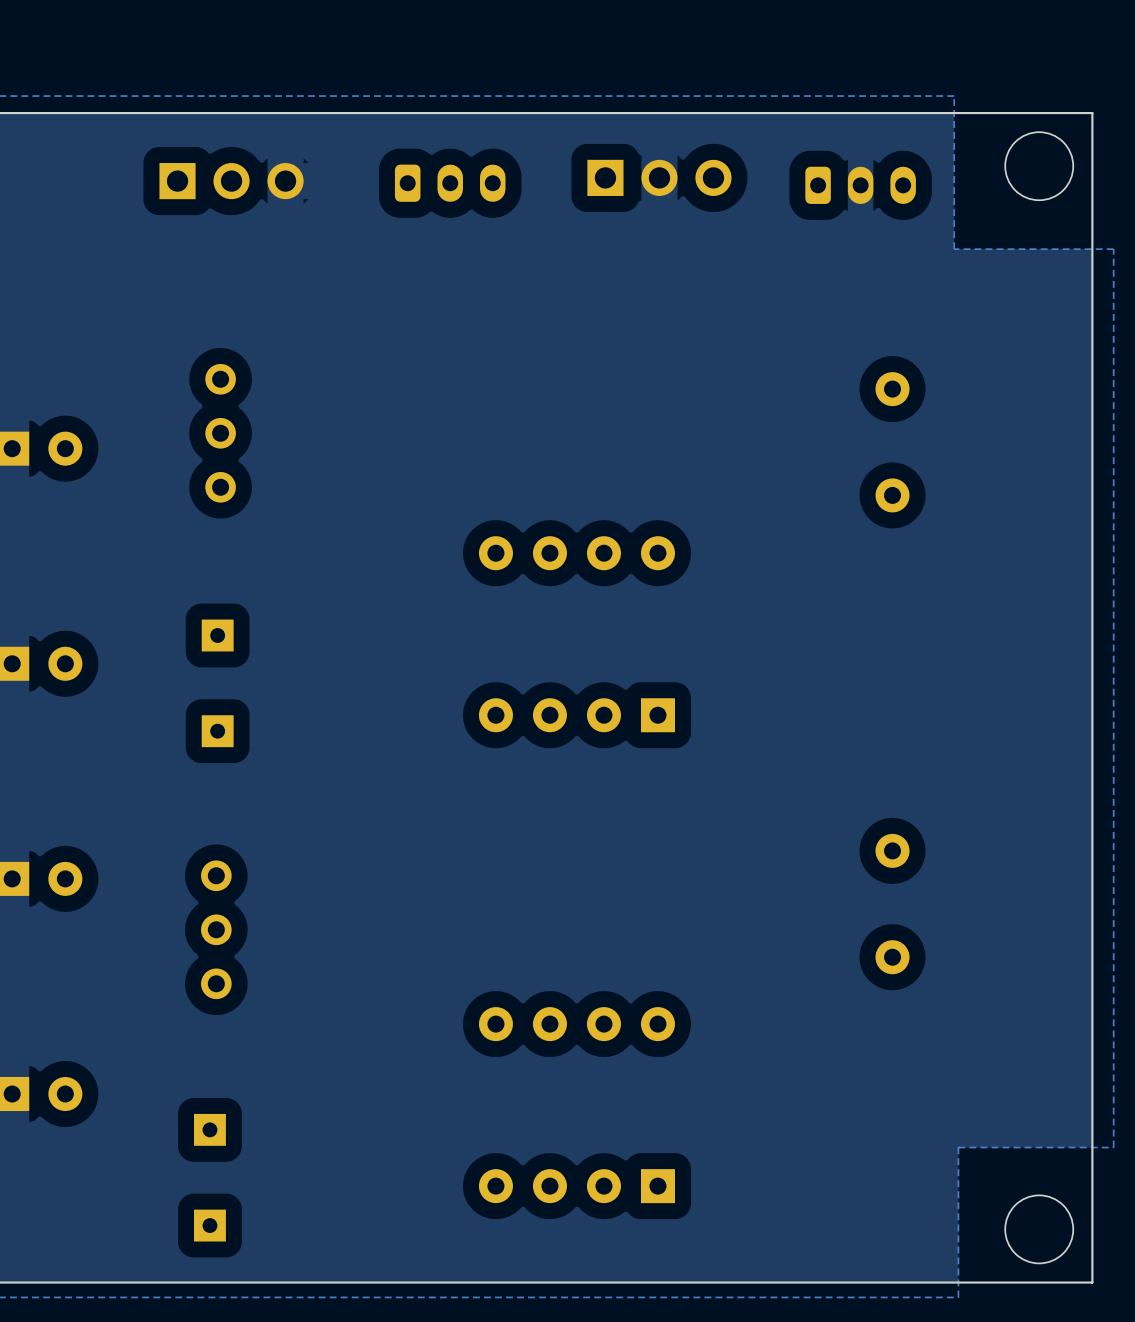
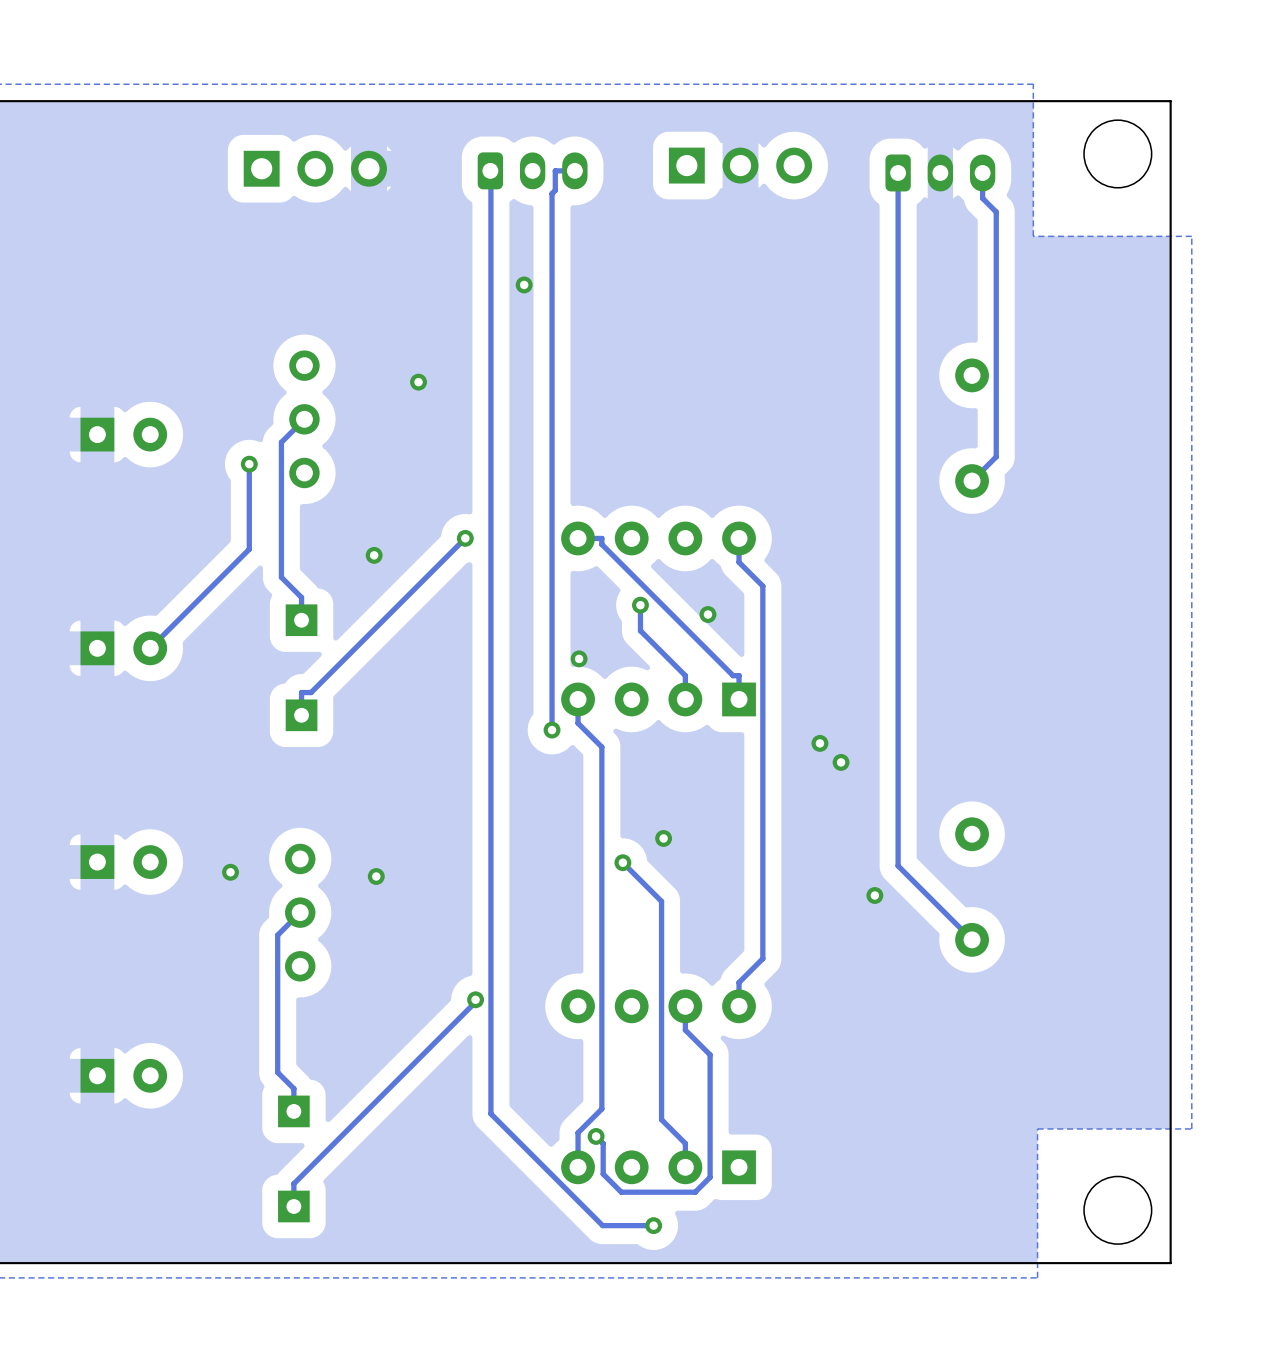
track: none -> (490, 171) (490, 1113) (602, 1225) (653, 1225)
track: none -> (574, 170) (555, 170) (555, 190) (552, 193) (552, 730)
track: none -> (898, 172) (898, 865) (972, 939)
track: none -> (982, 172) (982, 198) (996, 211) (996, 456) (972, 481)
via: none -> (524, 284)
via: none -> (418, 382)
track: none -> (304, 419) (281, 442) (281, 577) (301, 597) (301, 620)
track: none -> (249, 464) (249, 549) (150, 648)
via: none -> (249, 464)
track: none -> (465, 538) (311, 692) (301, 692) (301, 715)
via: none -> (465, 538)
track: none -> (578, 538) (601, 538) (601, 544) (733, 675) (739, 675) (739, 699)
track: none -> (739, 538) (739, 562) (762, 586) (762, 958) (739, 982) (739, 1006)
via: none -> (374, 555)
track: none -> (640, 605) (640, 630) (685, 675) (685, 699)
via: none -> (640, 605)
via: none -> (707, 614)
via: none -> (579, 658)
track: none -> (578, 699) (578, 723) (601, 747) (601, 1108) (578, 1132) (578, 1167)
via: none -> (552, 730)
via: none -> (819, 743)
via: none -> (841, 762)
via: none -> (663, 838)
track: none -> (622, 862) (661, 901) (661, 1119) (685, 1143) (685, 1167)
via: none -> (622, 862)
via: none -> (230, 872)
via: none -> (376, 876)
via: none -> (874, 895)
track: none -> (300, 912) (277, 935) (277, 1072) (293, 1088) (293, 1111)
track: none -> (475, 999) (475, 1002) (293, 1183) (293, 1206)
via: none -> (475, 999)
track: none -> (685, 1006) (685, 1030) (710, 1054) (710, 1177) (695, 1192) (621, 1192) (603, 1174) (603, 1143) (596, 1136)
via: none -> (596, 1136)
via: none -> (653, 1225)

